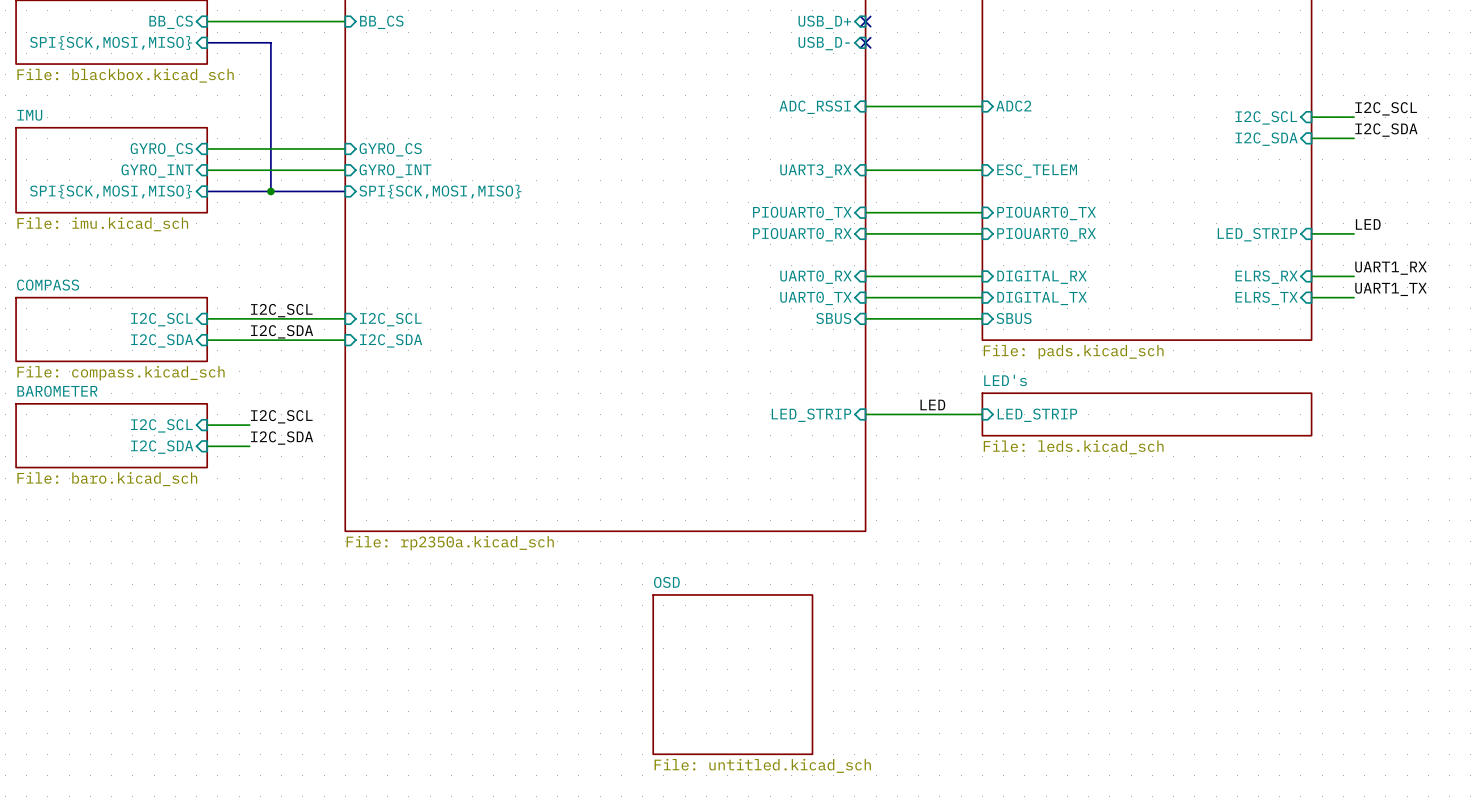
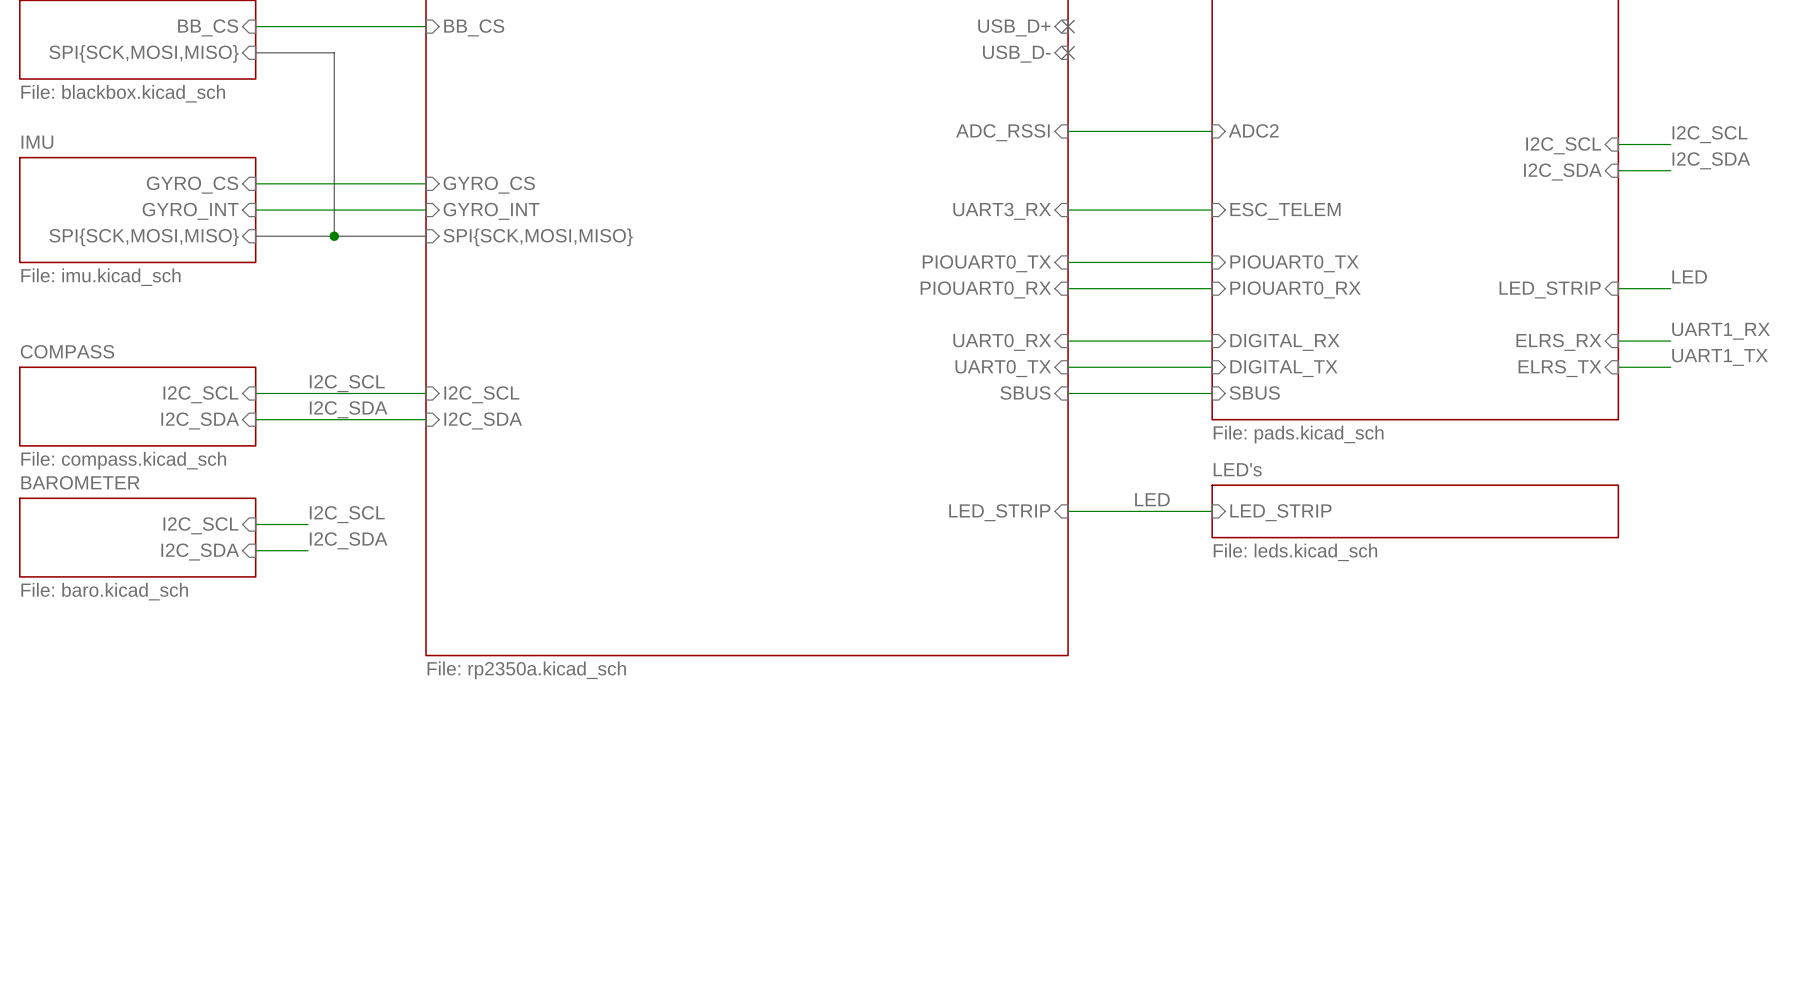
sheet OSD: File: untitled.kicad_sch (732, 674) -> none

